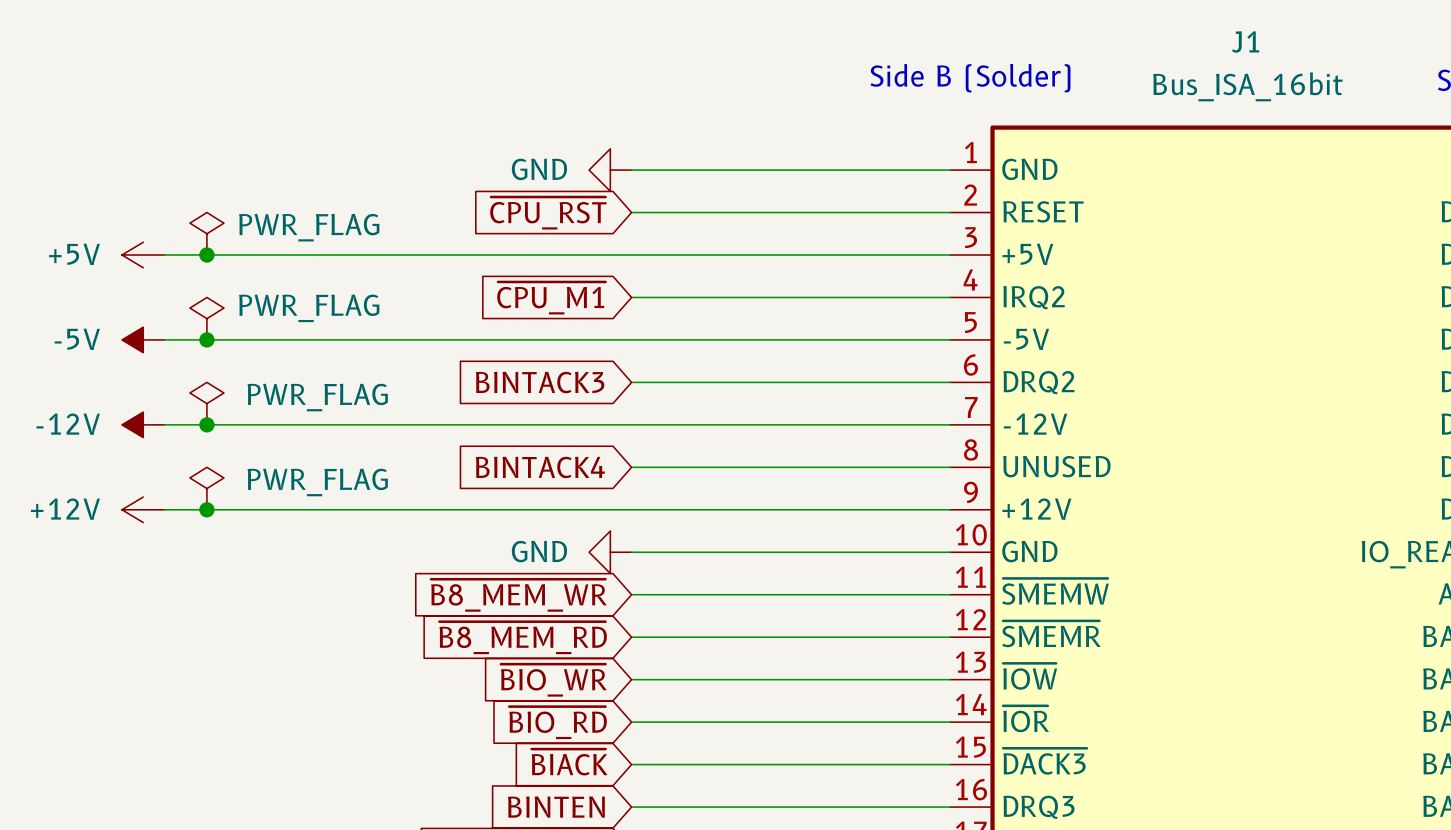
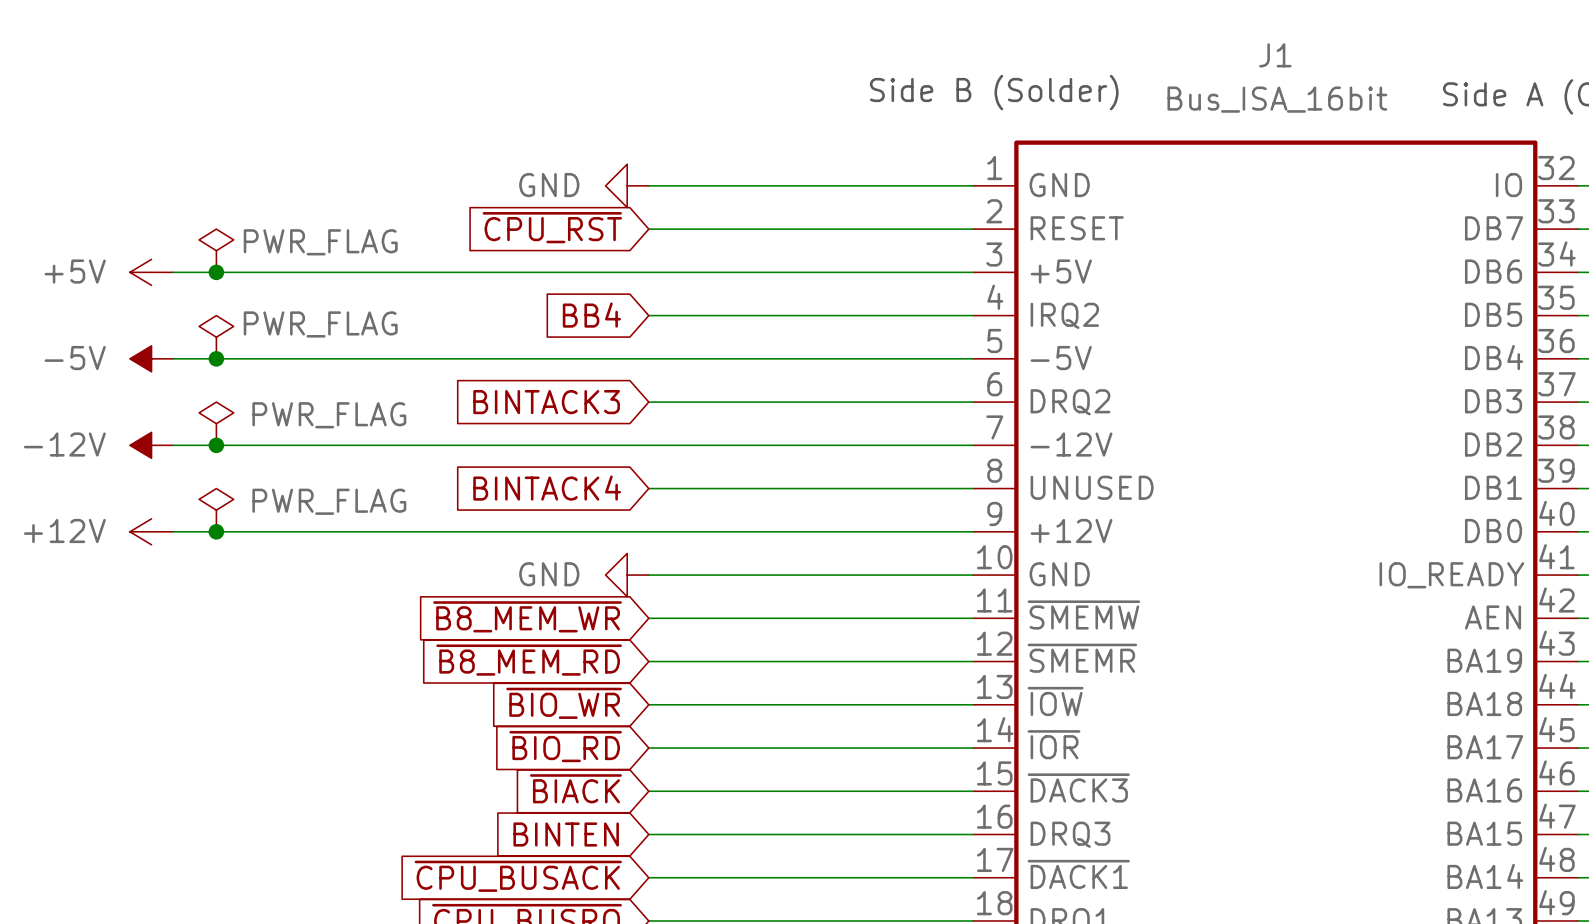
global label: ~{CPU_M1} (551, 298) -> BB4 (591, 315)

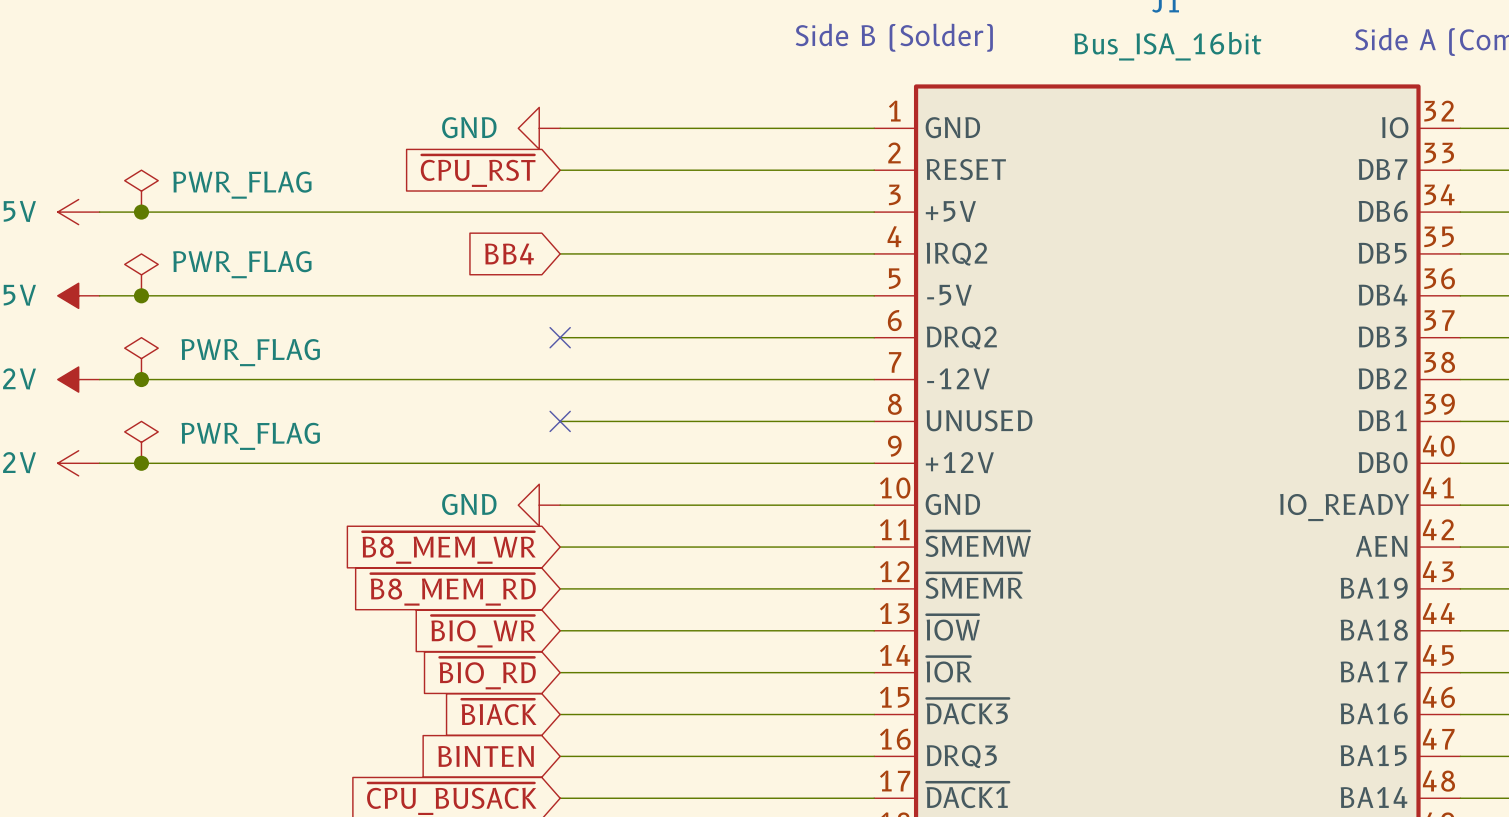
global label: BINTACK3 (546, 402) -> none
no-connect mark: none -> (560, 337)
global label: BINTACK4 (547, 488) -> none
no-connect mark: none -> (560, 421)

